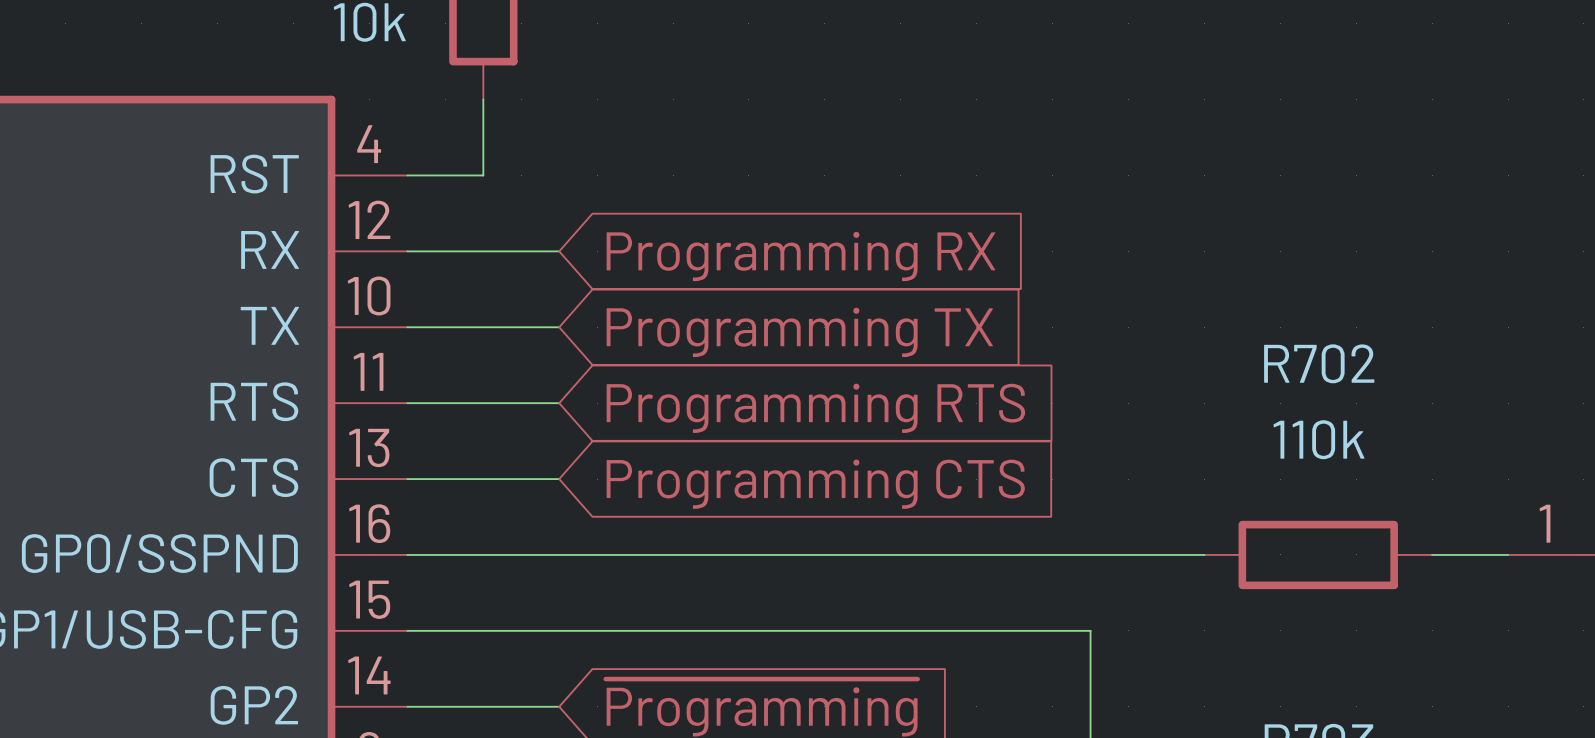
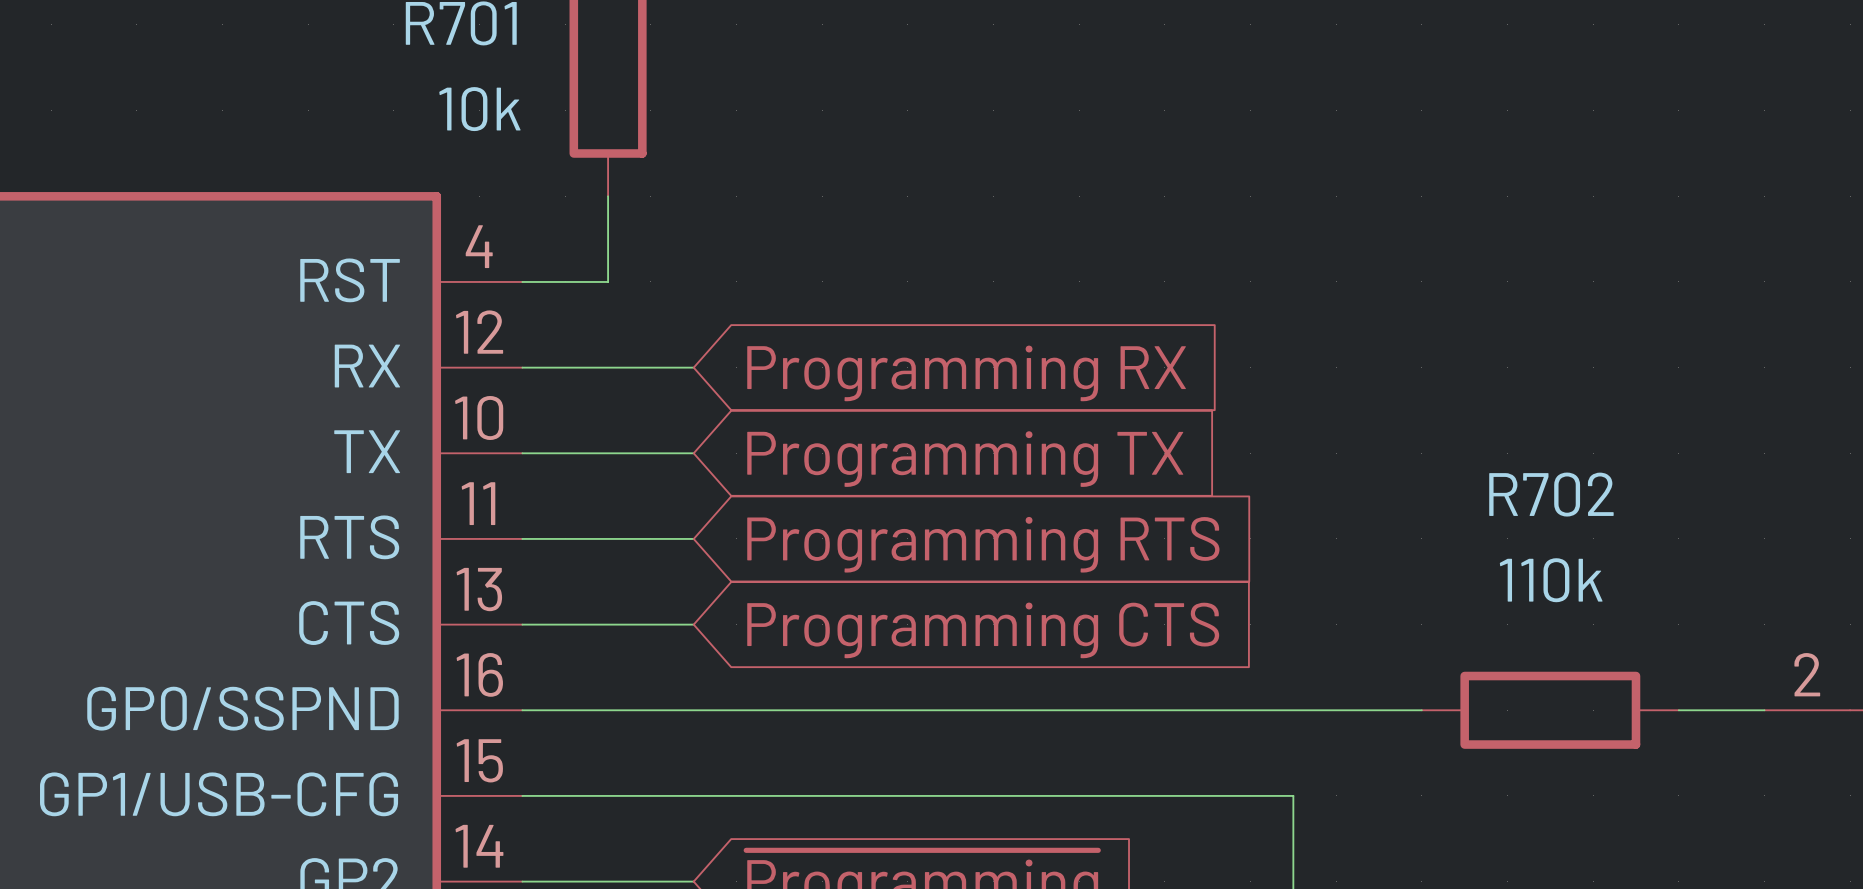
part pin number: 1 (1545, 523) -> 2 (1807, 674)

